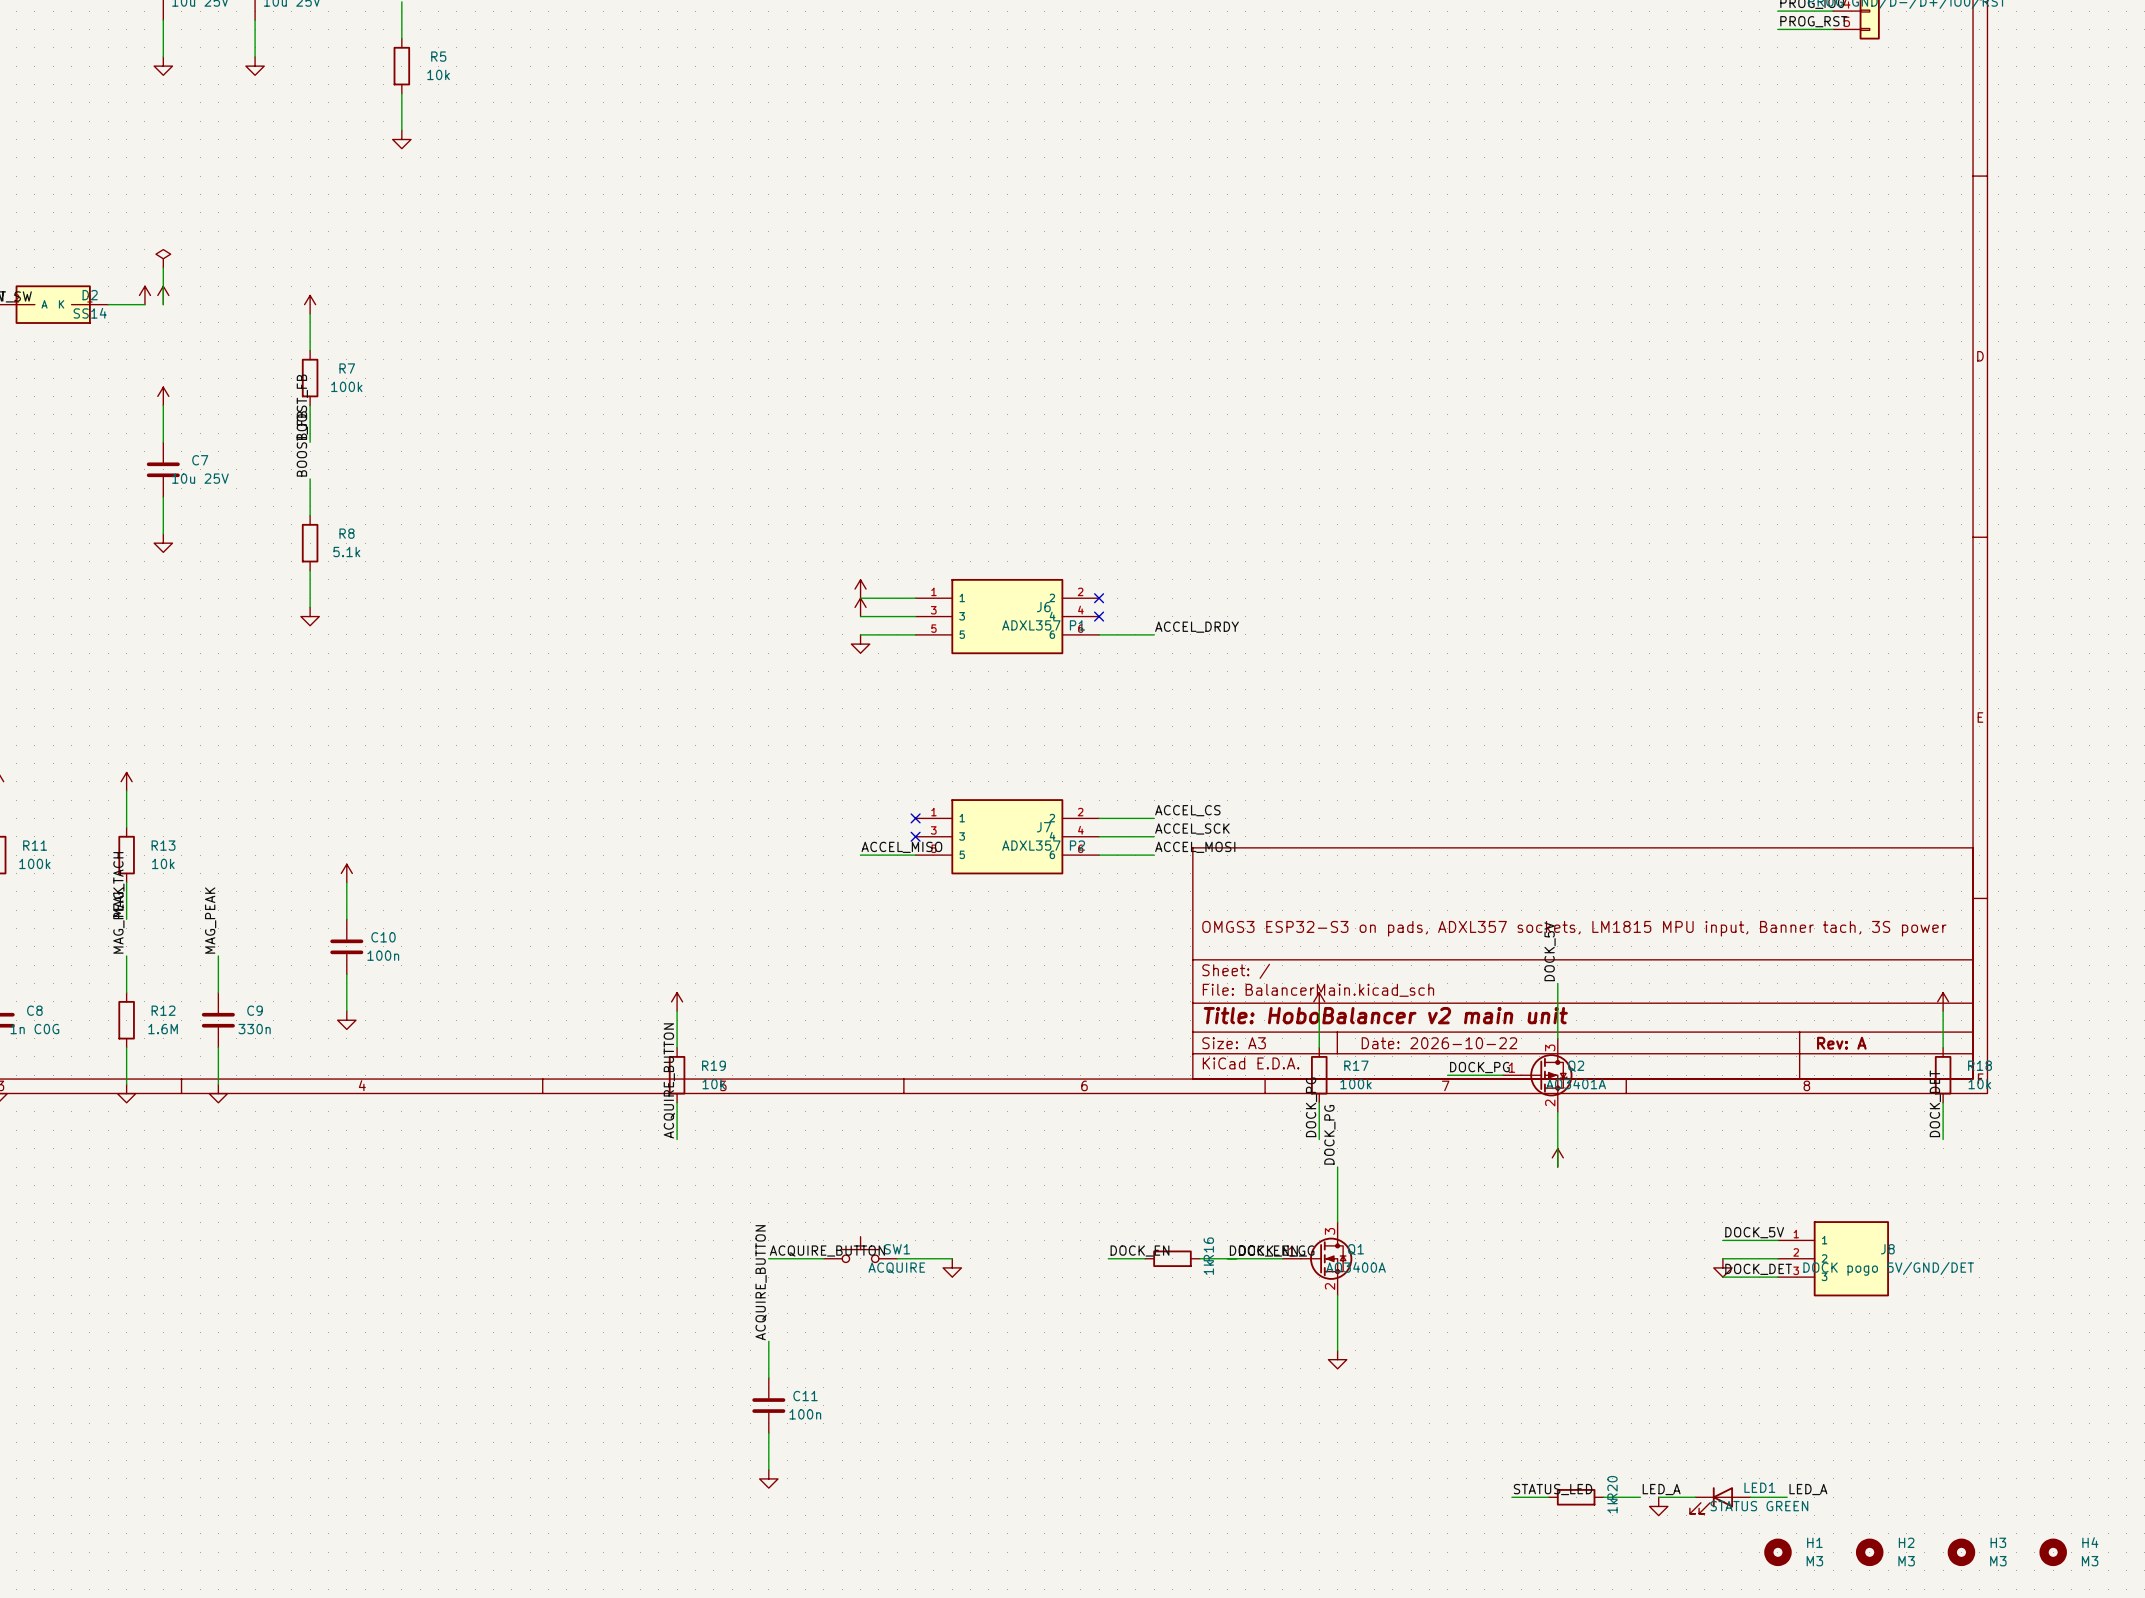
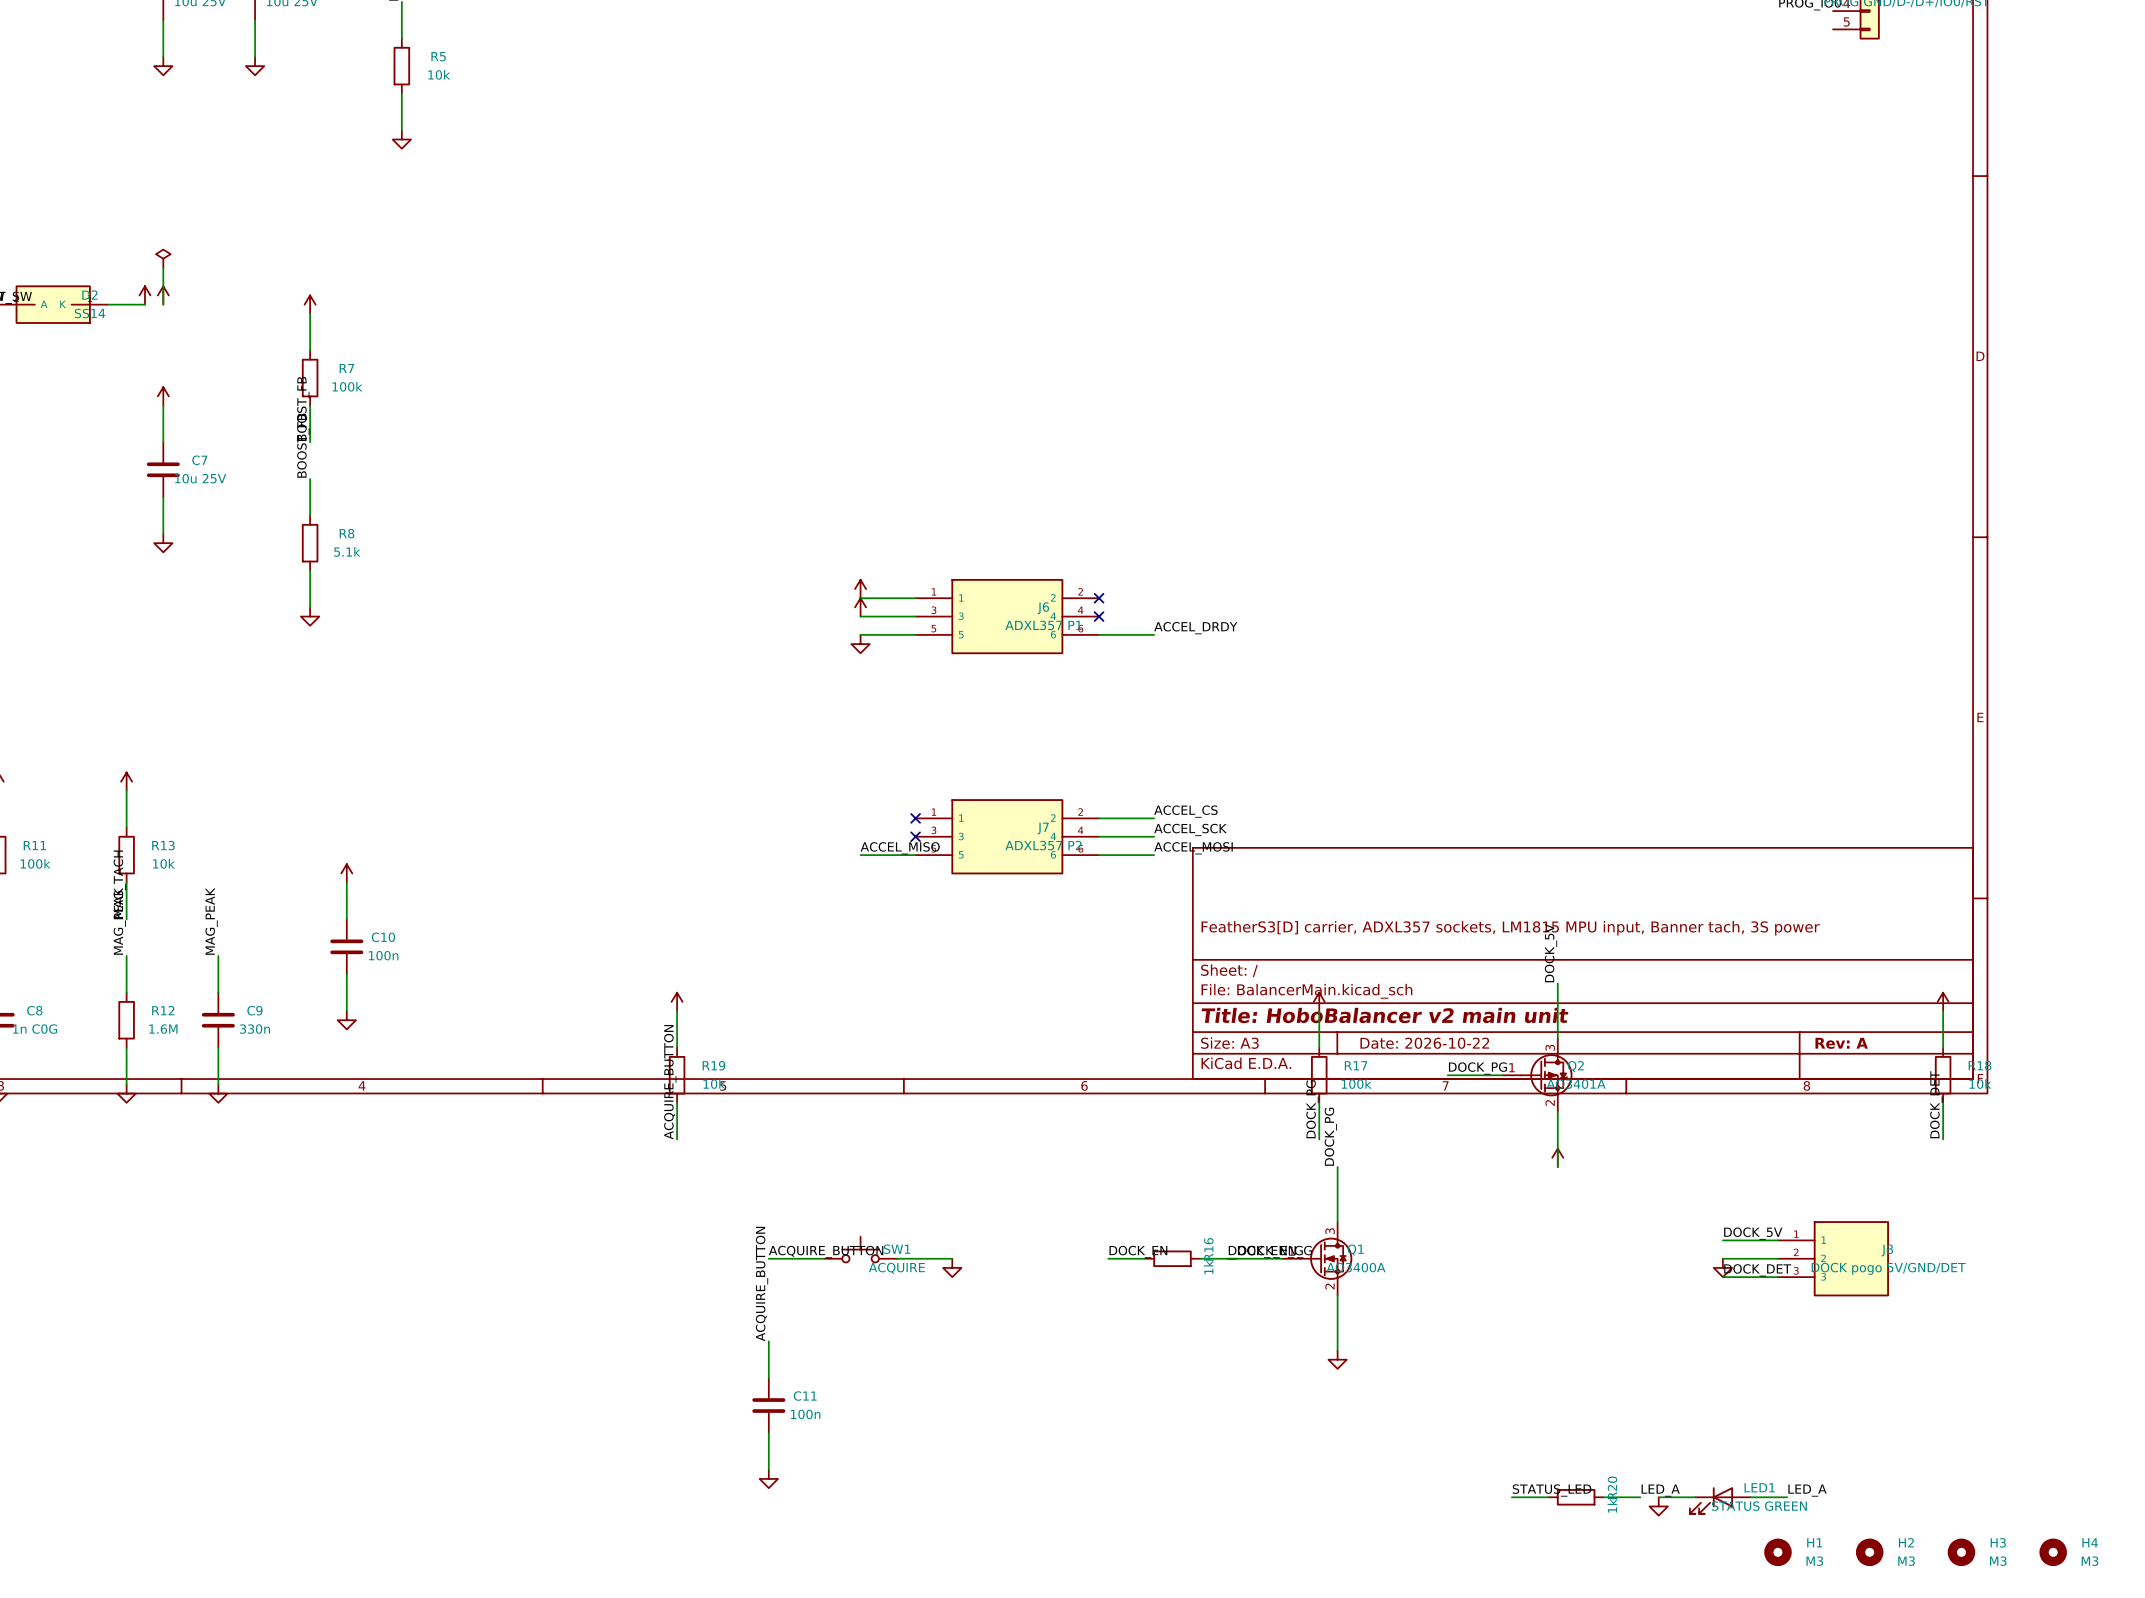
wire: (1777, 11) (1833, 11) -> none
label: PROG_RST (1813, 21) -> none
wire: (1777, 29) (1833, 29) -> none
title block: OMGS3 ESP32-S3 on pads, ADXL357 sockets, LM1815 MPU input, Banner tach, 3S power (1574, 928) -> FeatherS3[D] carrier, ADXL357 sockets, LM1815 MPU input, Banner tach, 3S power (1510, 928)

